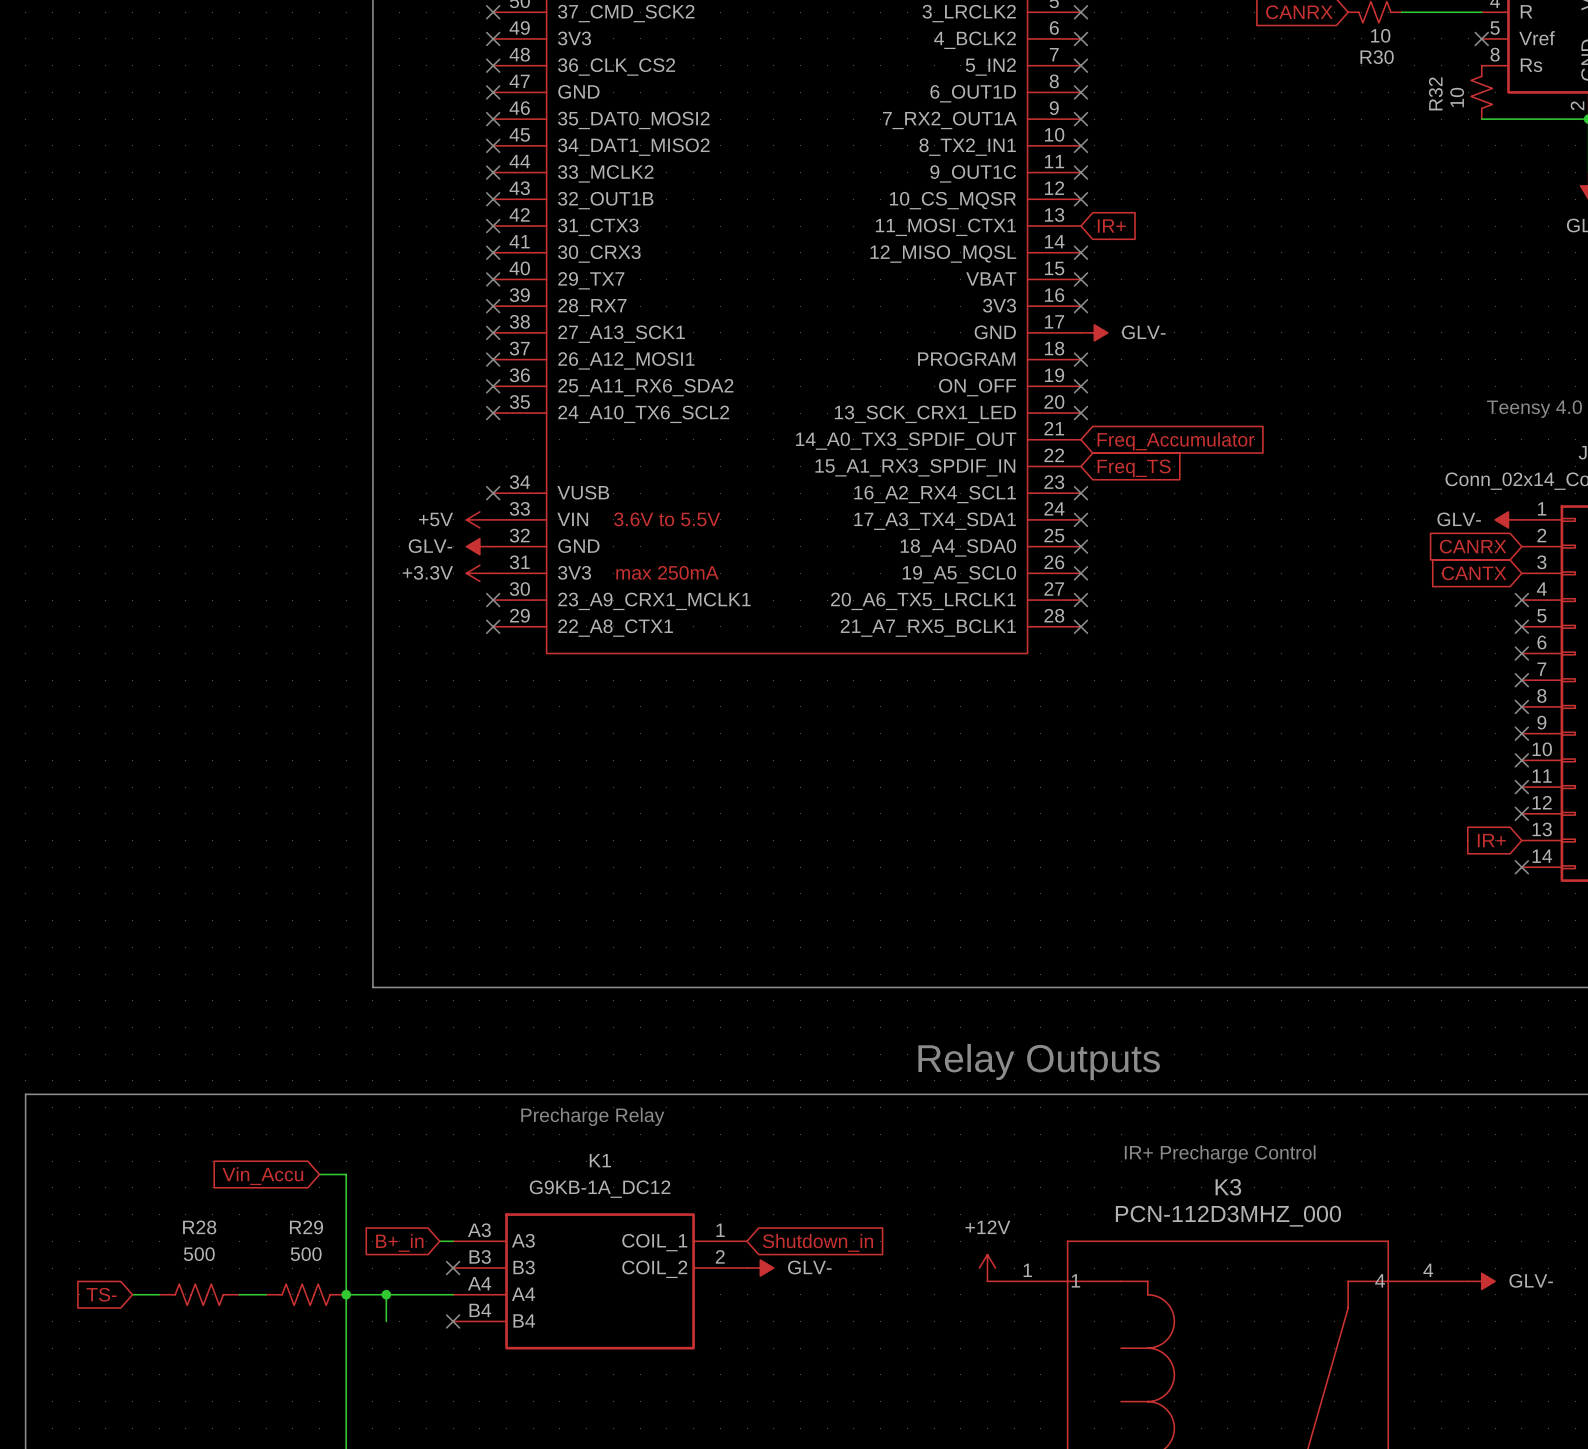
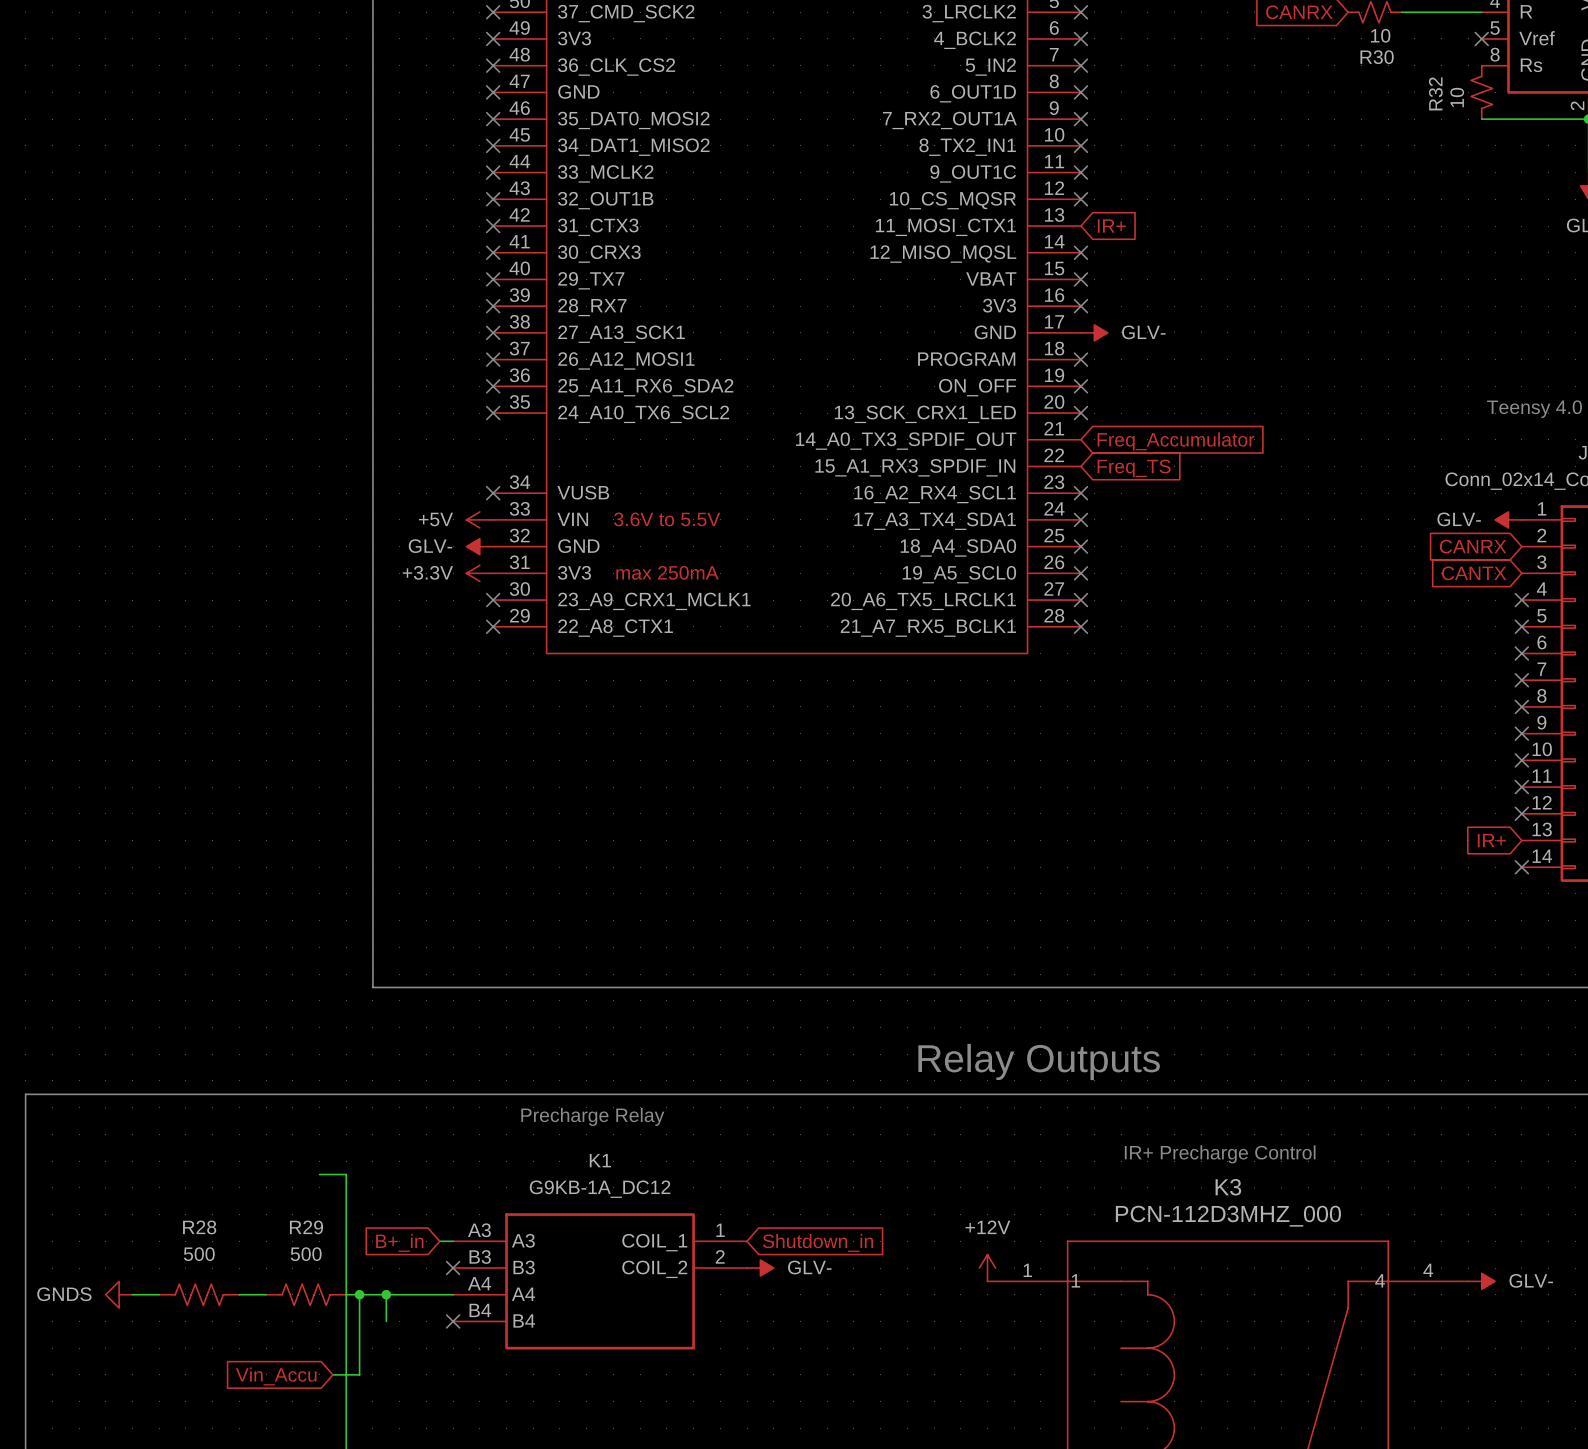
global label position: Vin_Accu (262, 1176) -> Vin_Accu (276, 1376)
global label: TS- (101, 1294) -> none
power symbol: none -> GNDS (119, 1294)
junction position: (346, 1294) -> (359, 1294)
wire: none -> (359, 1294) (359, 1374) (332, 1374)

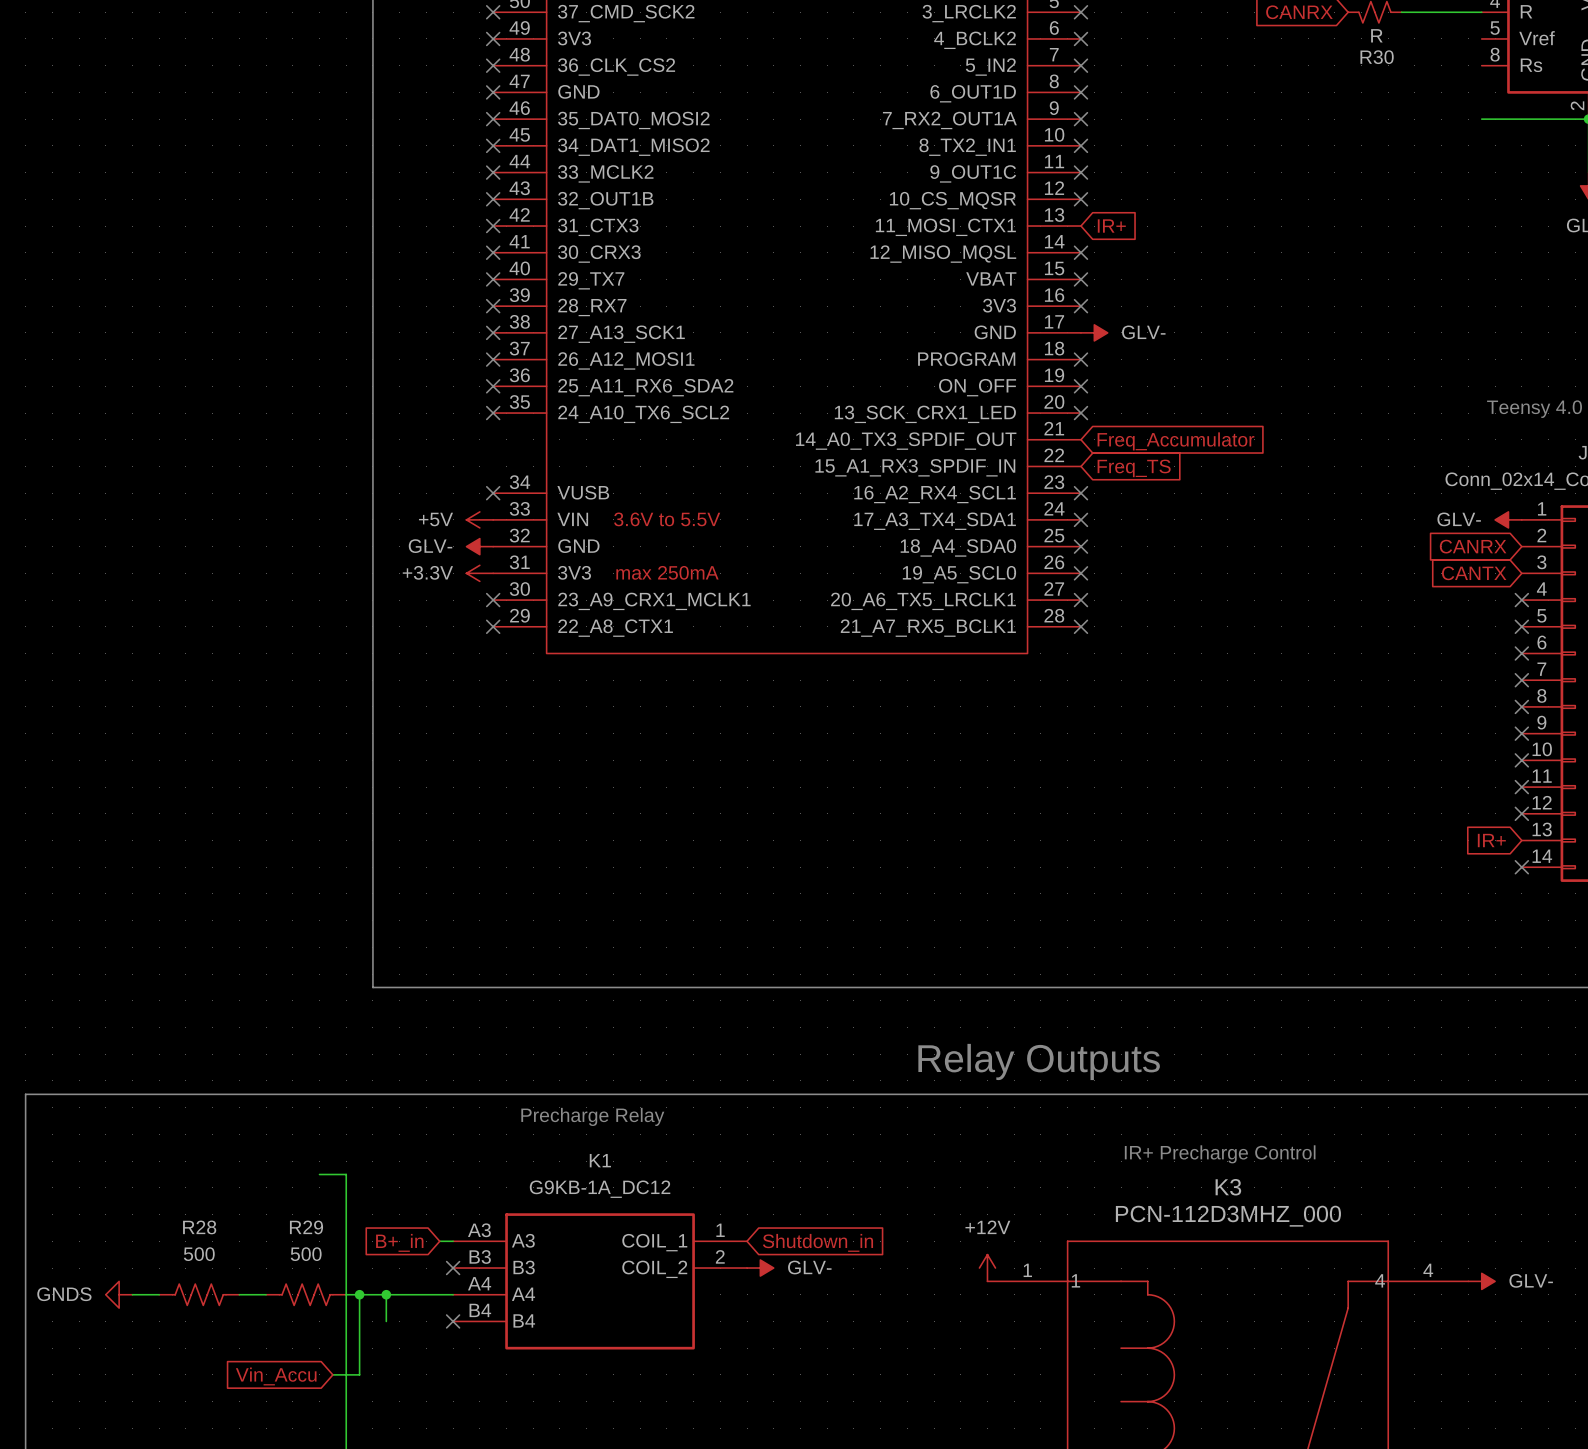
R30 value: 10 (1380, 35) -> R (1376, 35)
no-connect mark: (1481, 38) -> none
R32: 10 (1481, 92) -> none

